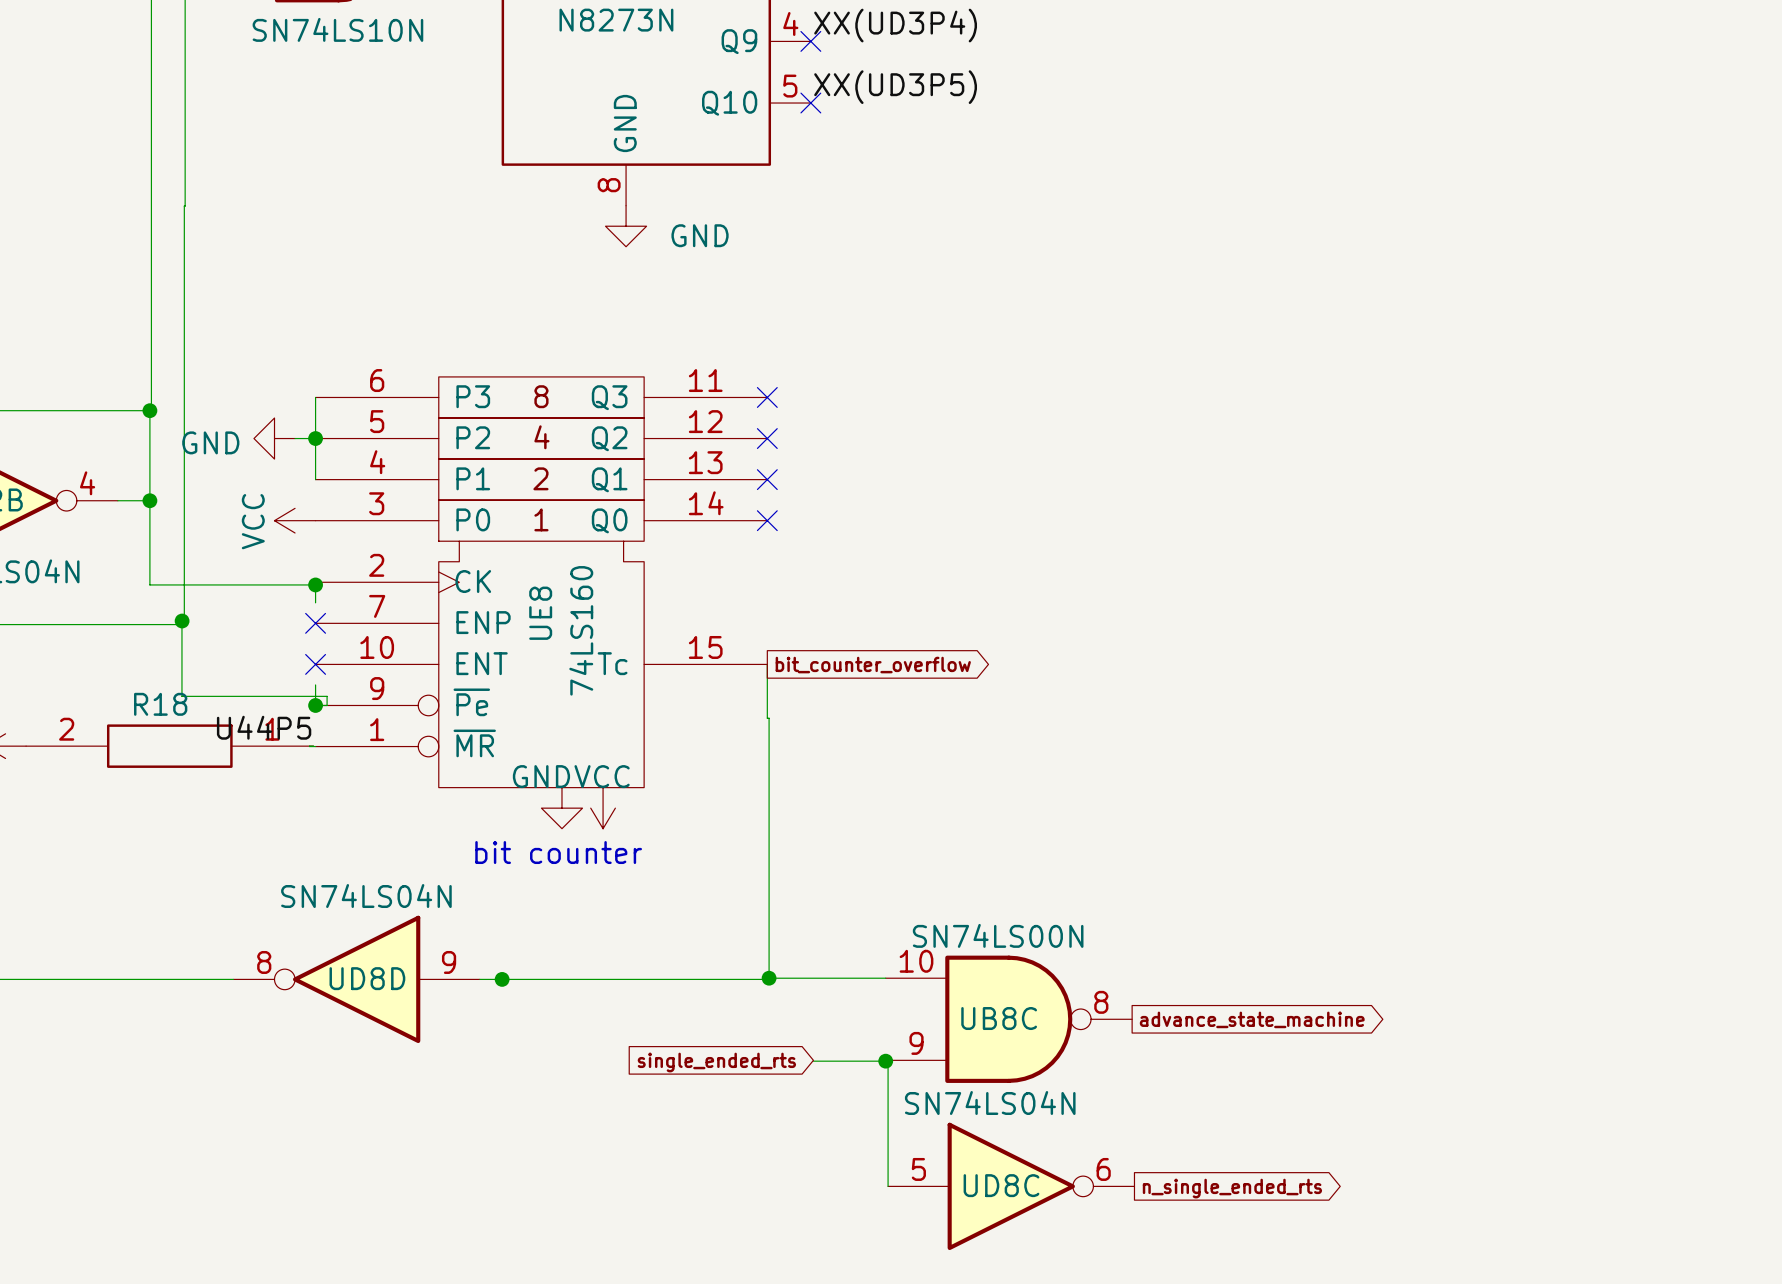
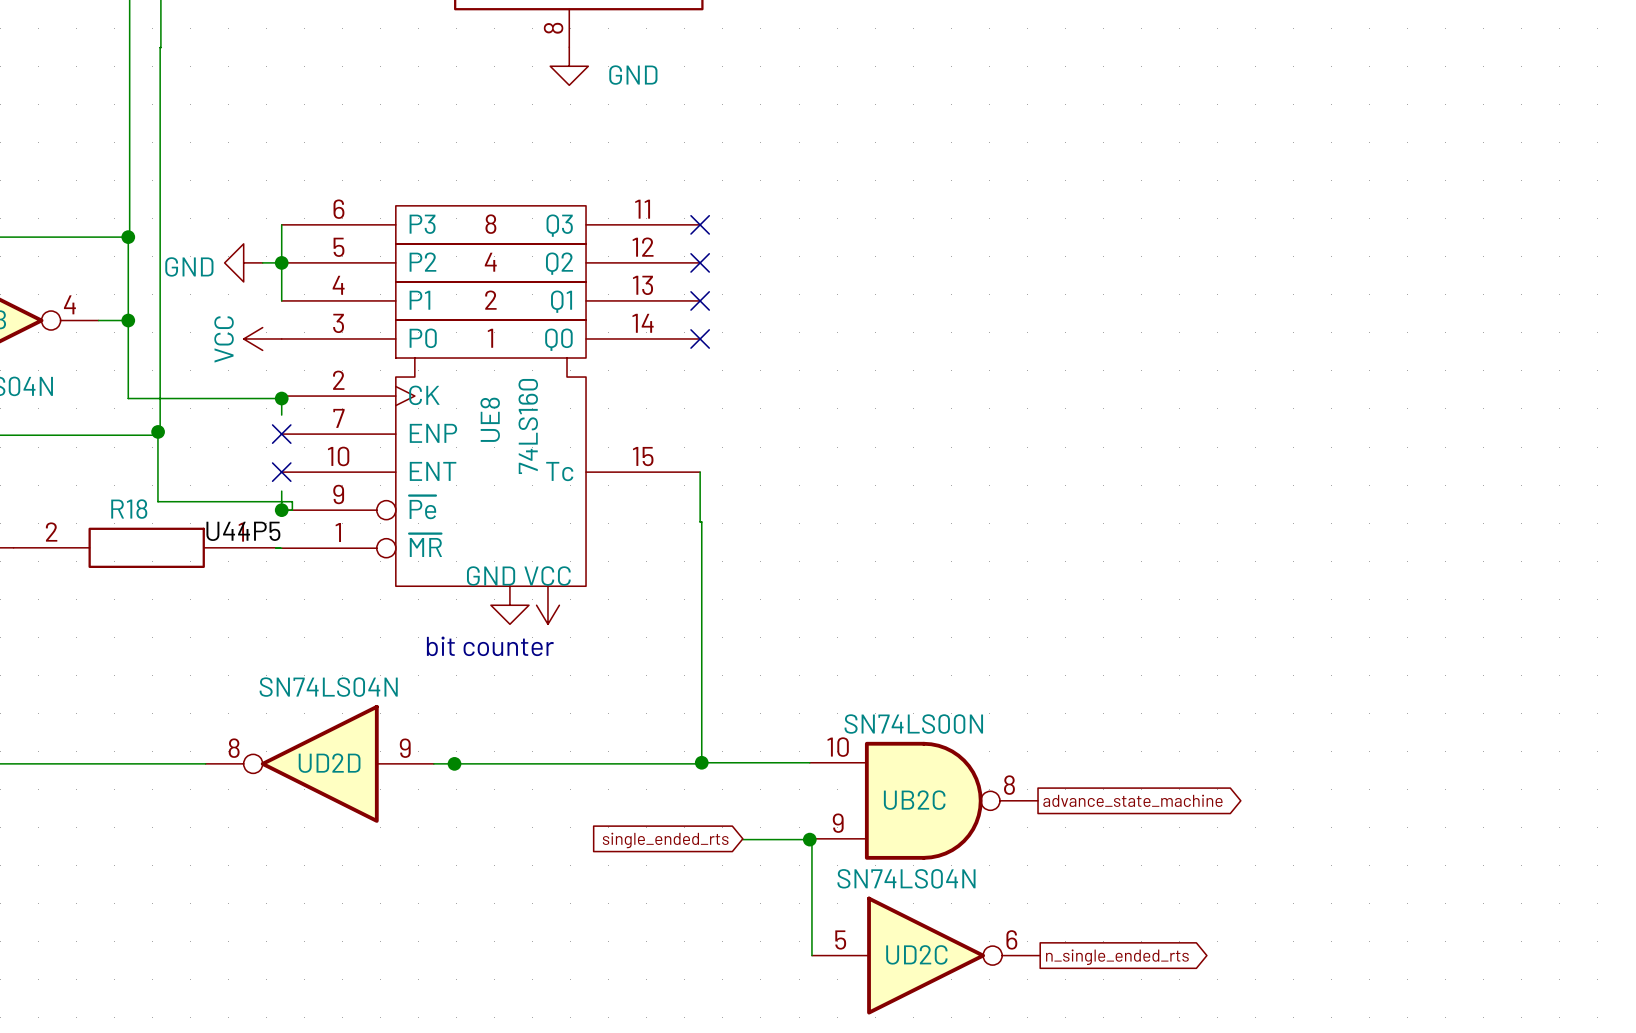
global label: bit_counter_overflow (873, 665) -> none
UD8D name: UD8D (367, 978) -> UD2D (329, 763)
UB8C name: UB8C (999, 1018) -> UB2C (914, 800)
UD8C name: UD8C (1001, 1185) -> UD2C (916, 954)

